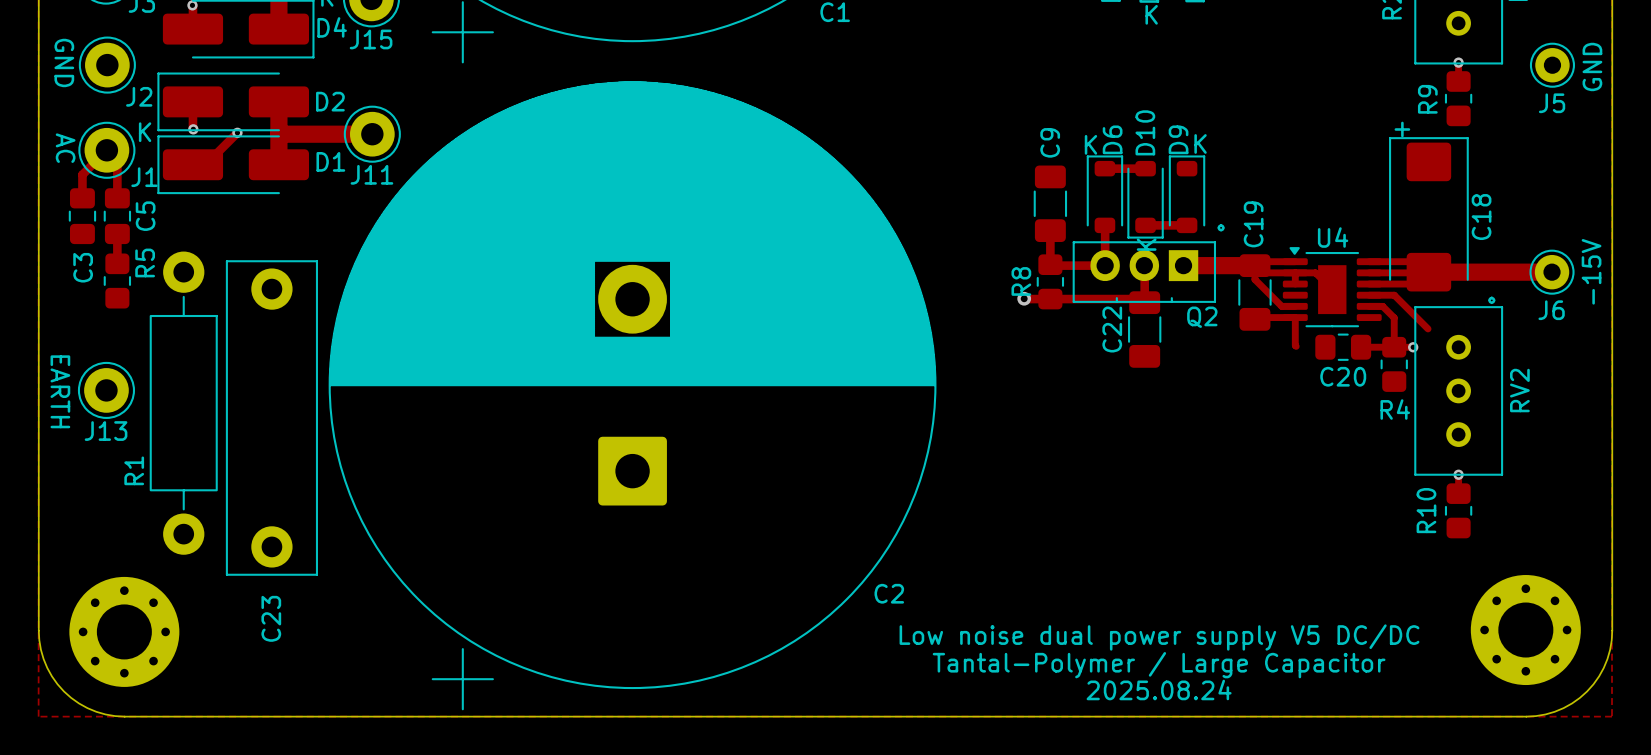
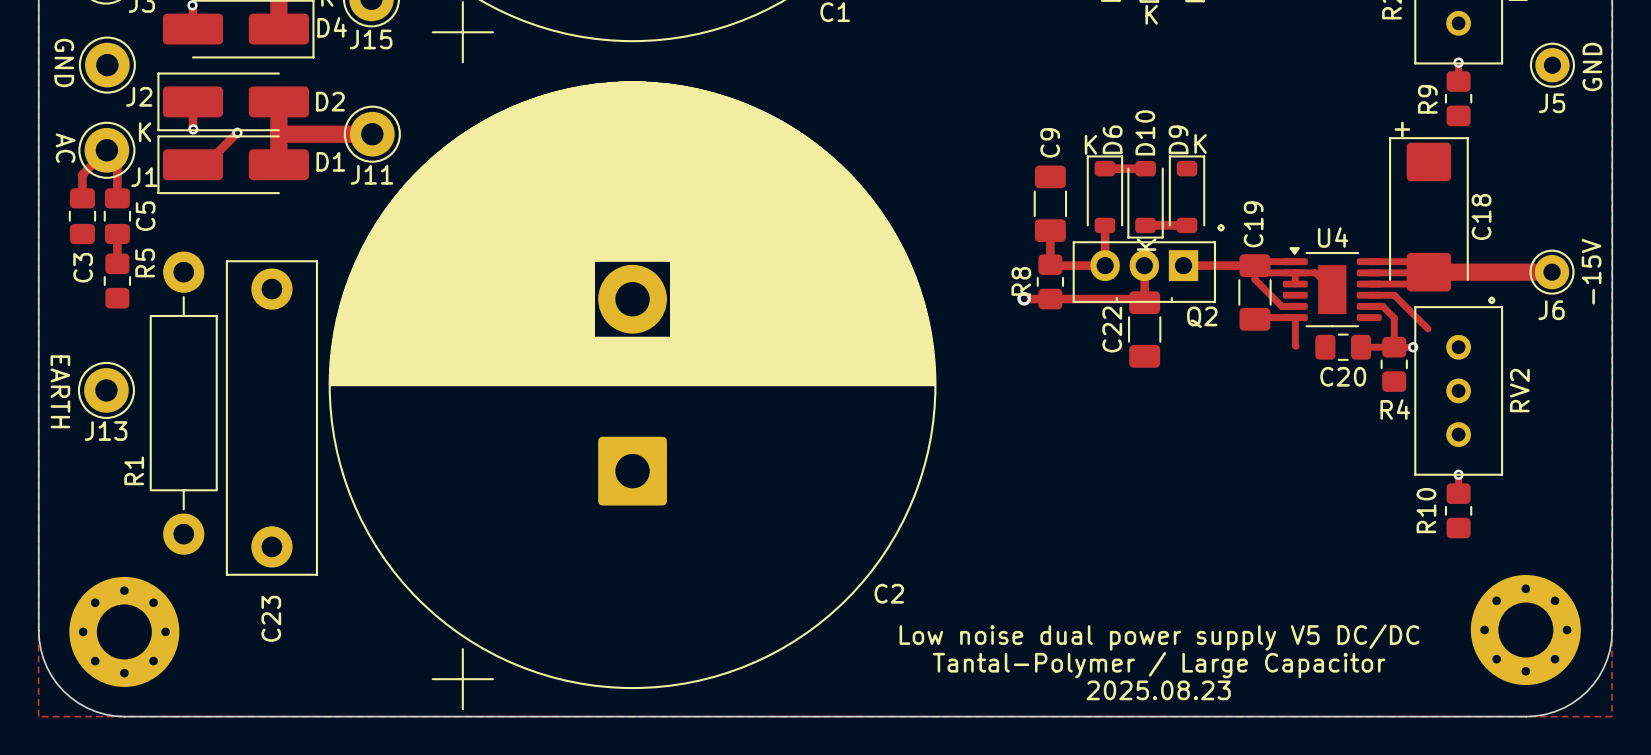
track width: thick (1183, 265) (1254, 265) -> thin (1183, 265) (1254, 265)
text: 2025.08.24 (1159, 689) -> 2025.08.23 (1158, 690)

